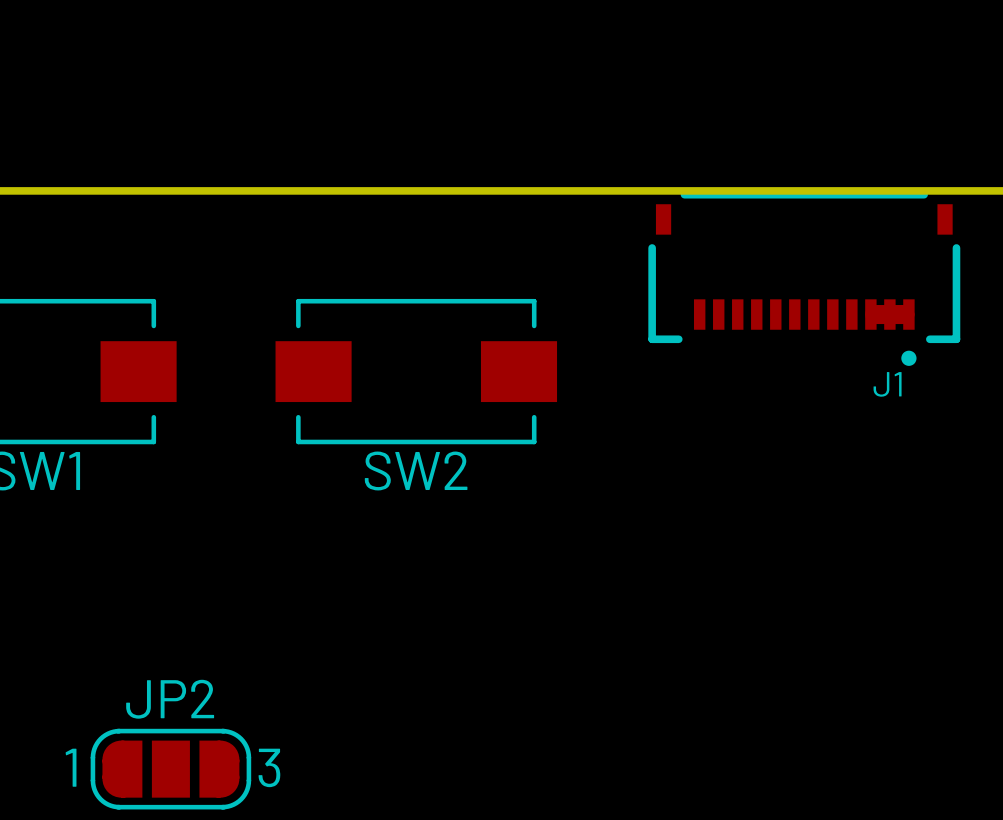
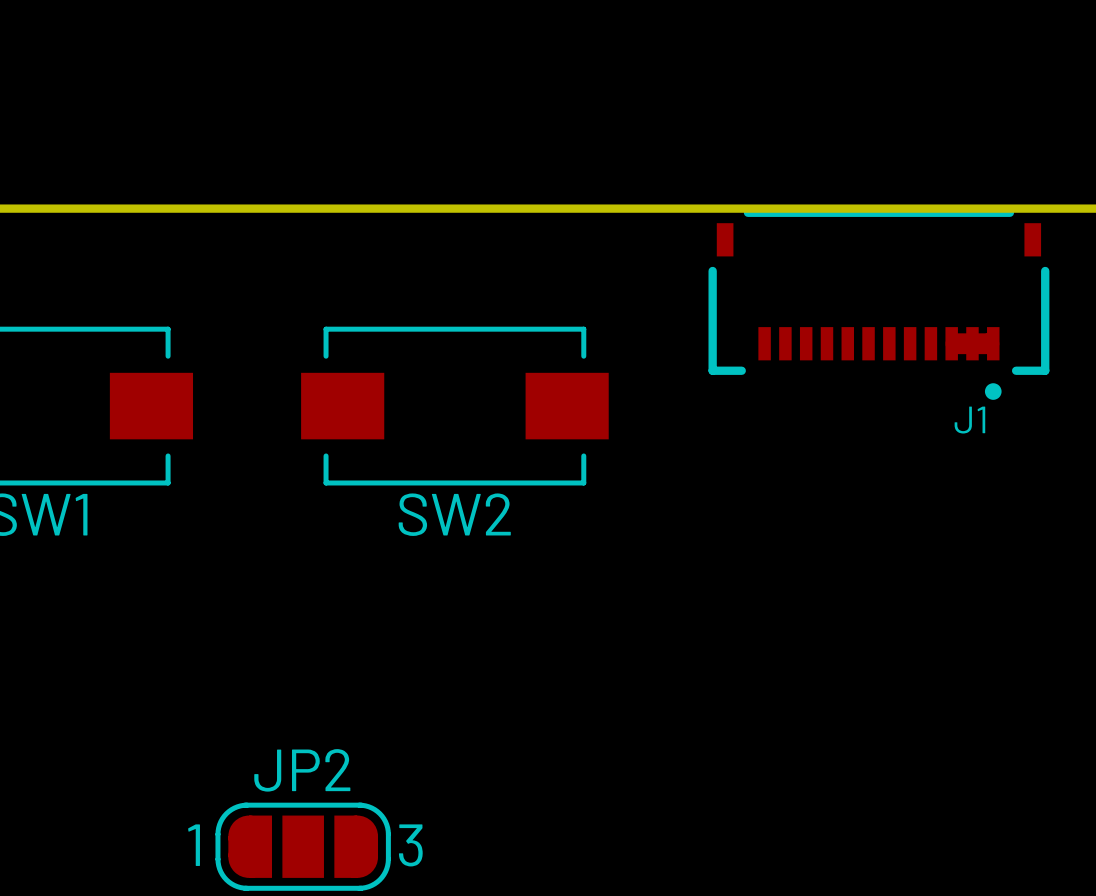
JP2 position: (170, 769) -> (303, 846)

